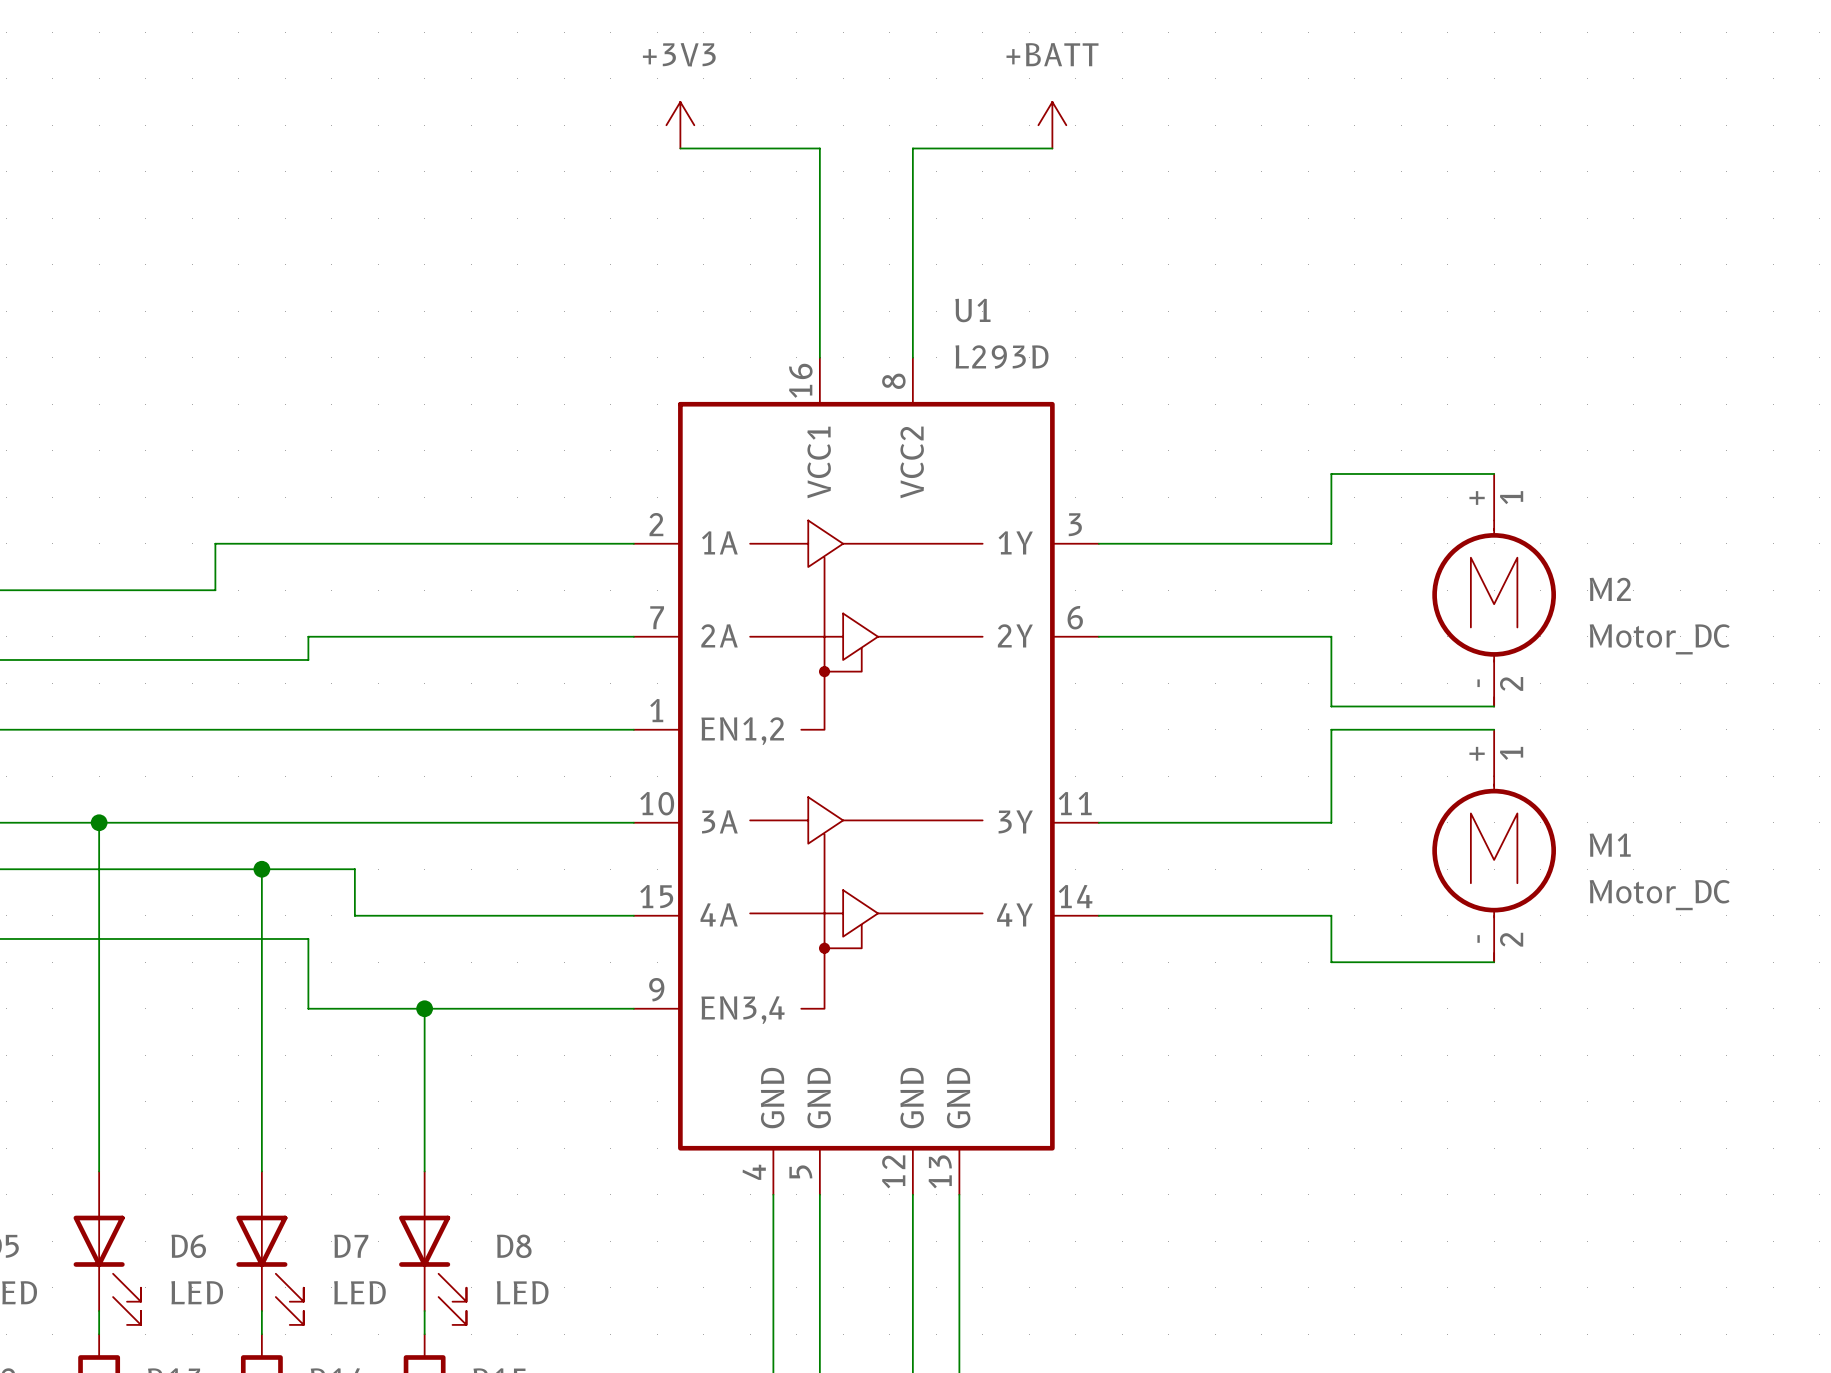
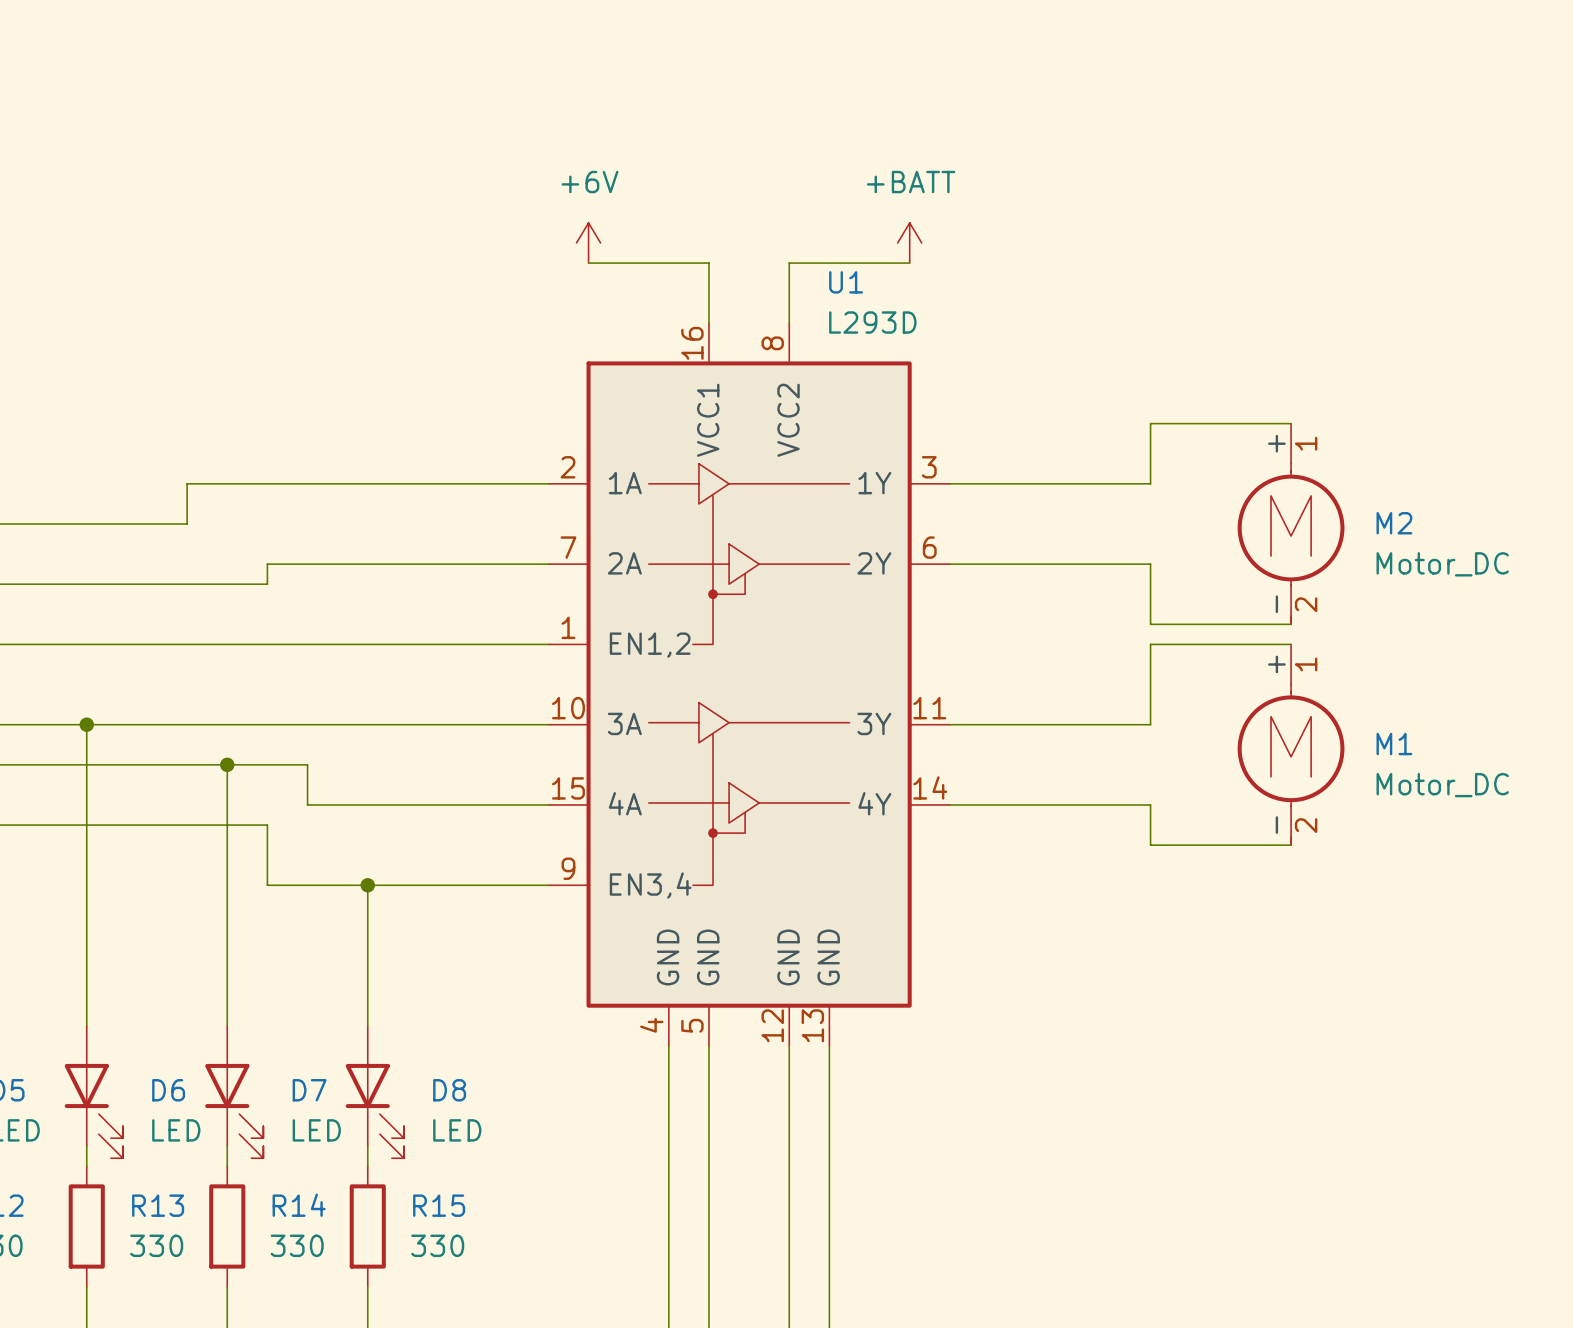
power symbol: +3V3 (680, 125) -> none
power symbol position: +BATT (1052, 125) -> +BATT (909, 242)
wire: (680, 148) (819, 148) (819, 287) -> (588, 263) (708, 263)
wire: (1052, 148) (912, 148) (912, 287) -> (909, 263) (789, 263)
power symbol: none -> +6V (588, 242)

